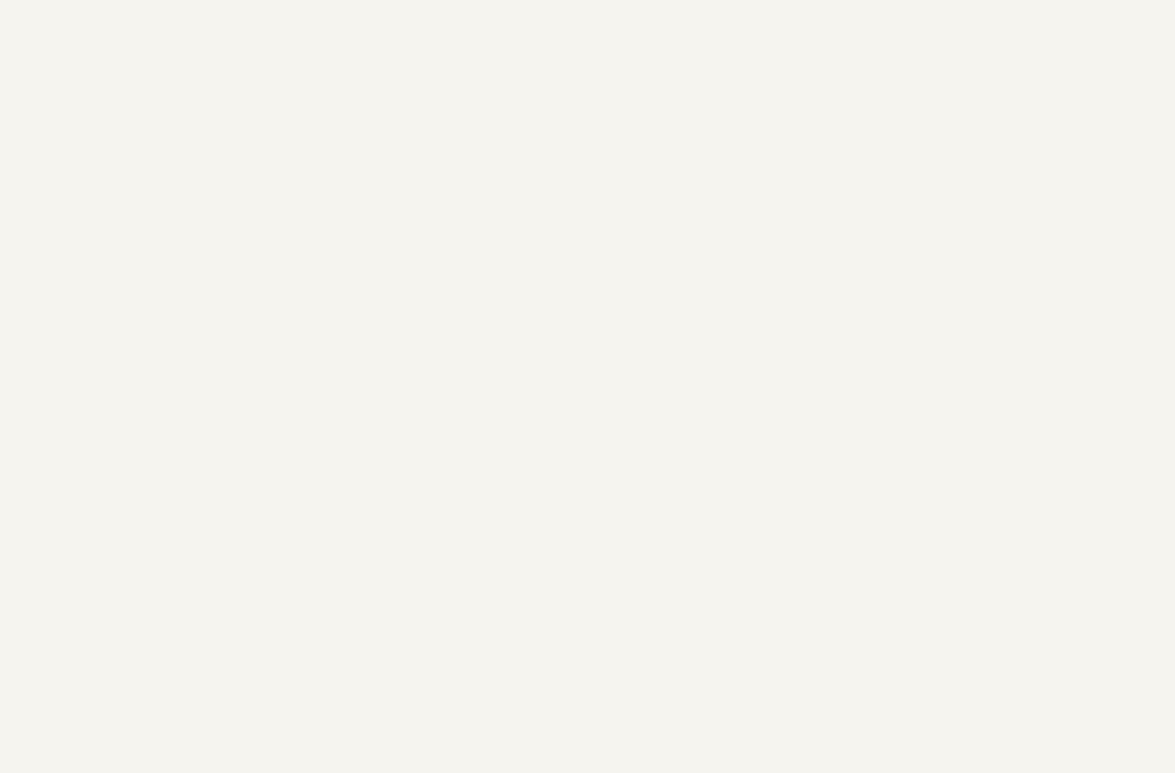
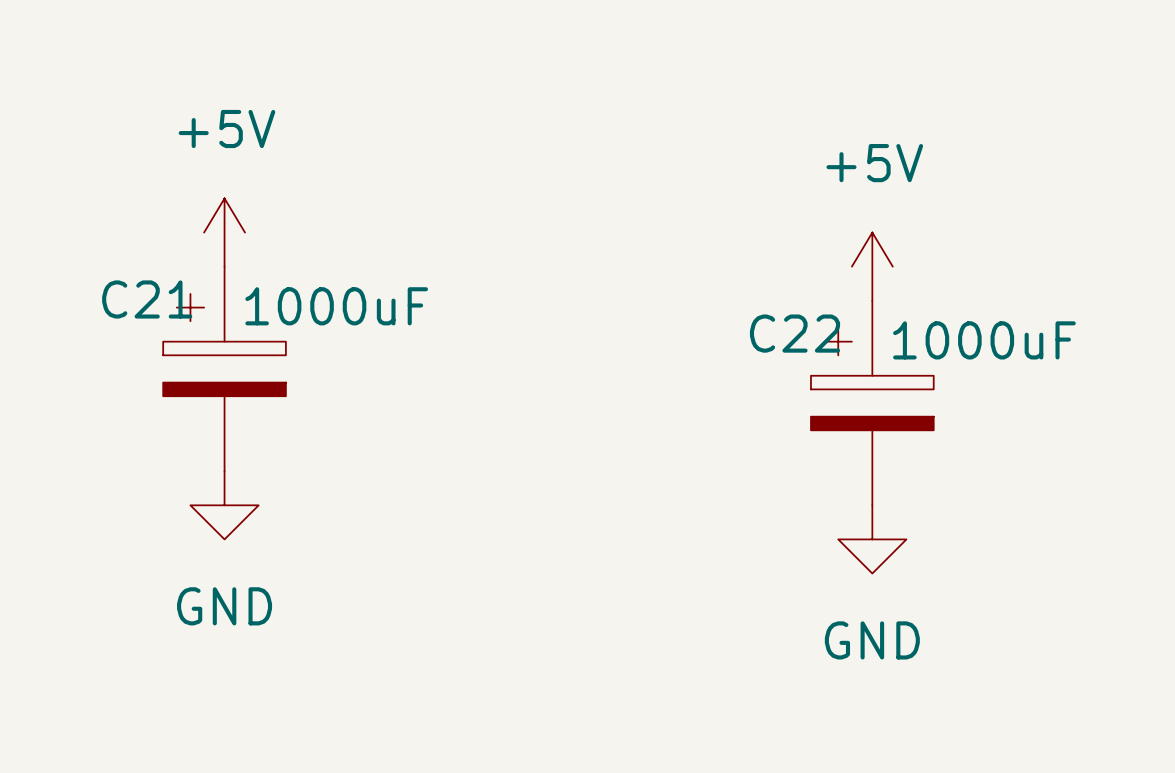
power symbol: none -> +5V (224, 232)
power symbol: none -> +5V (872, 266)
C21: none -> 1000uF (224, 368)
C22: none -> 1000uF (872, 403)
power symbol: none -> GND (224, 505)
power symbol: none -> GND (872, 539)

